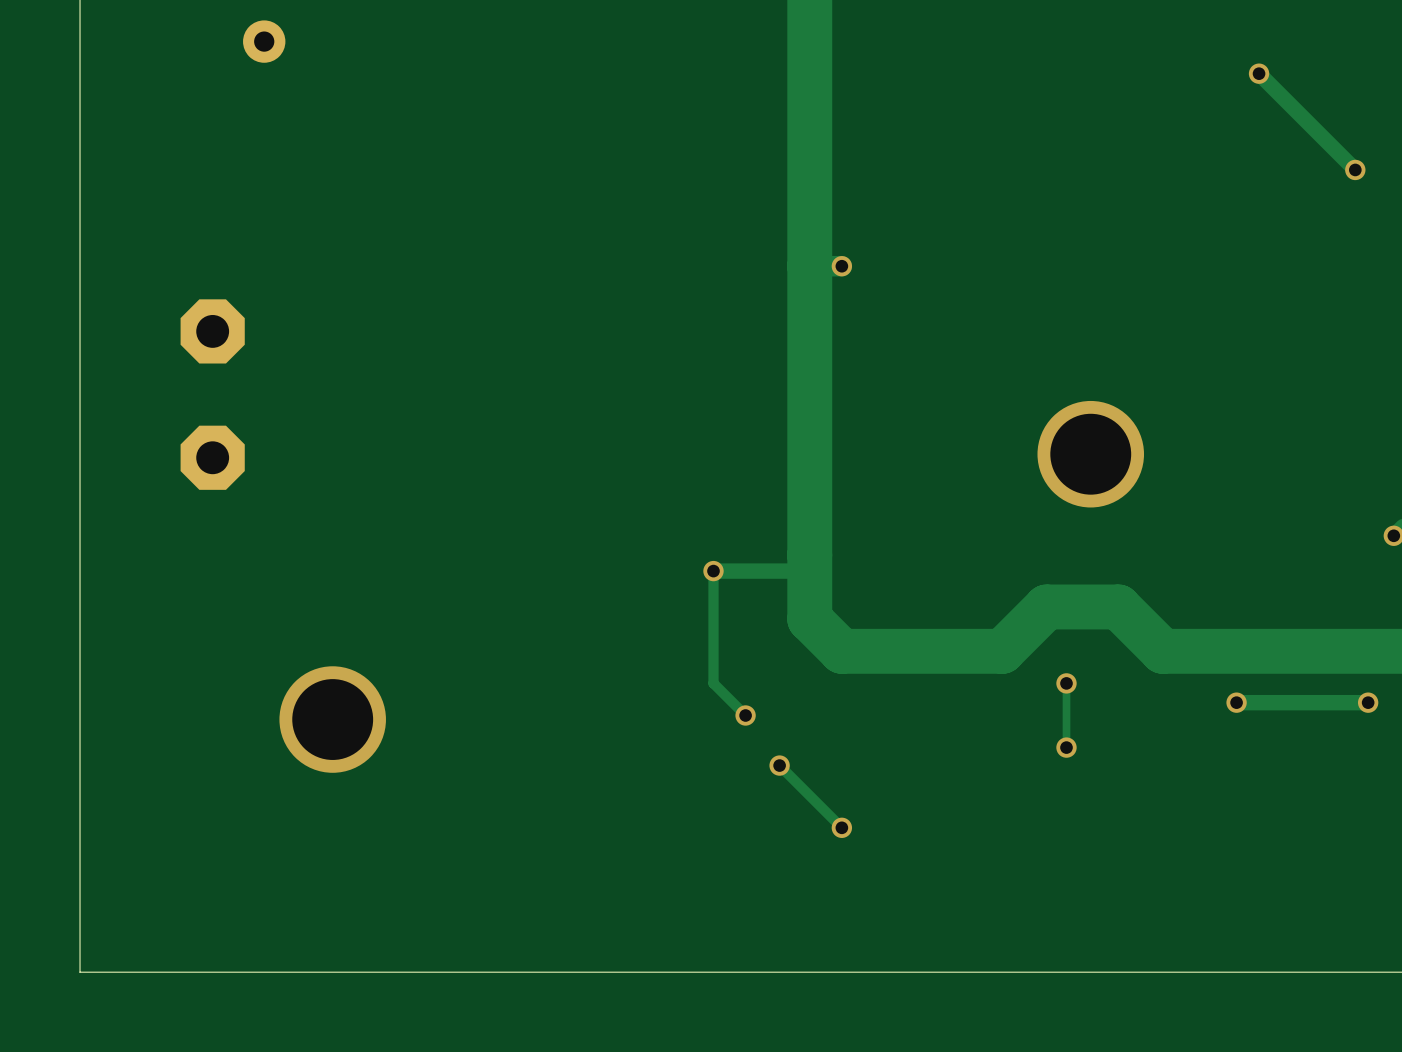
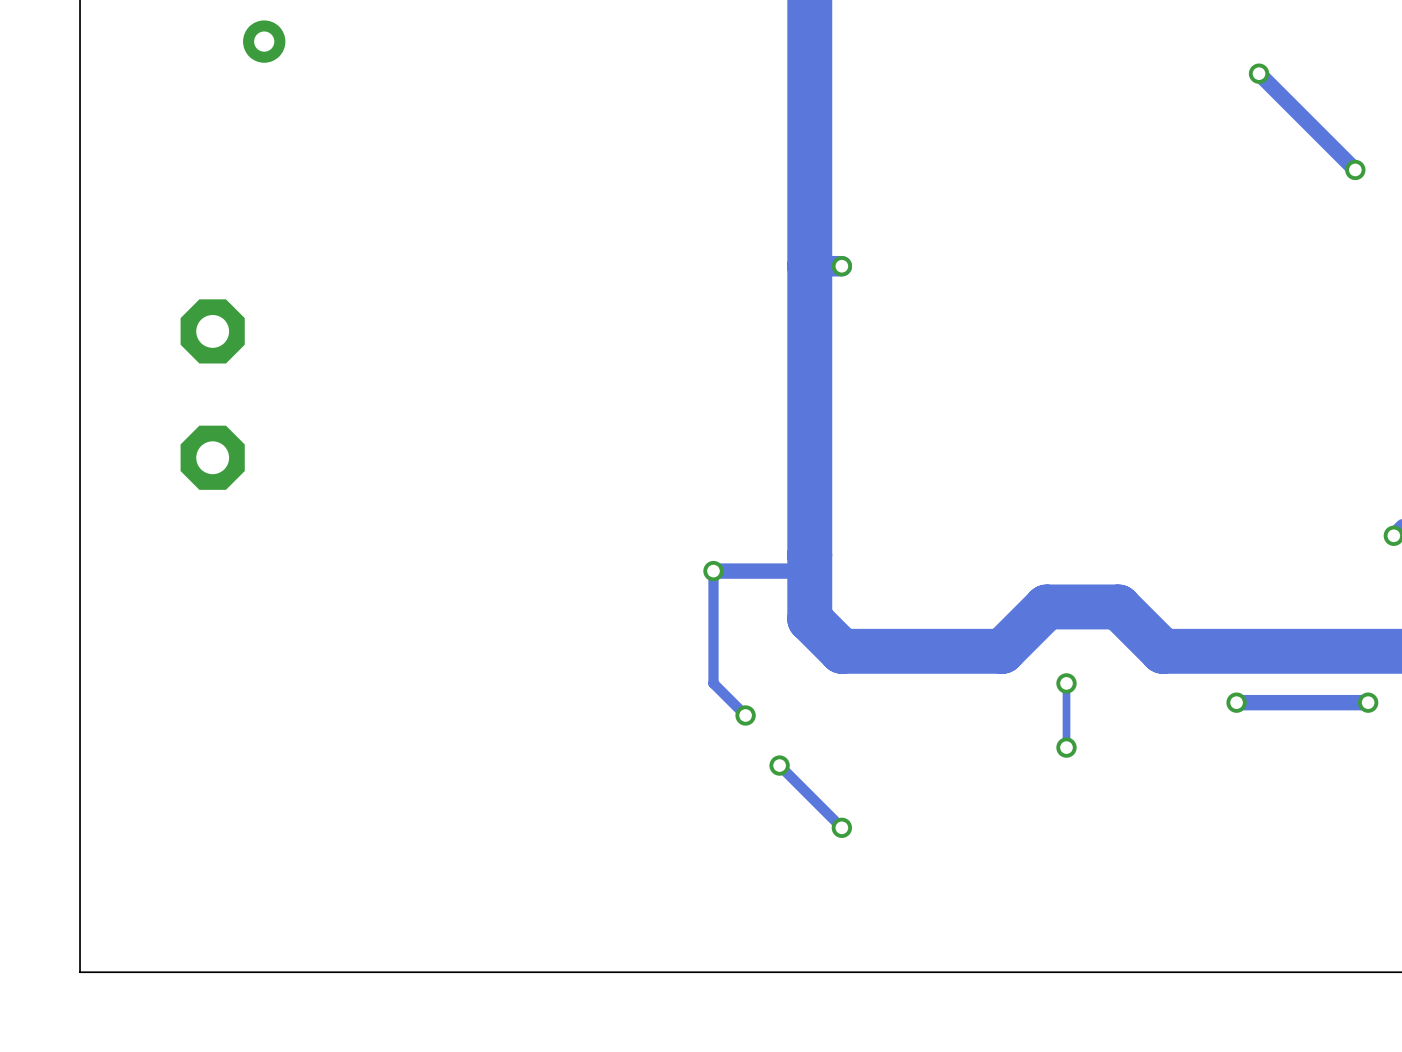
via: (1090, 454) -> none
via: (332, 719) -> none

